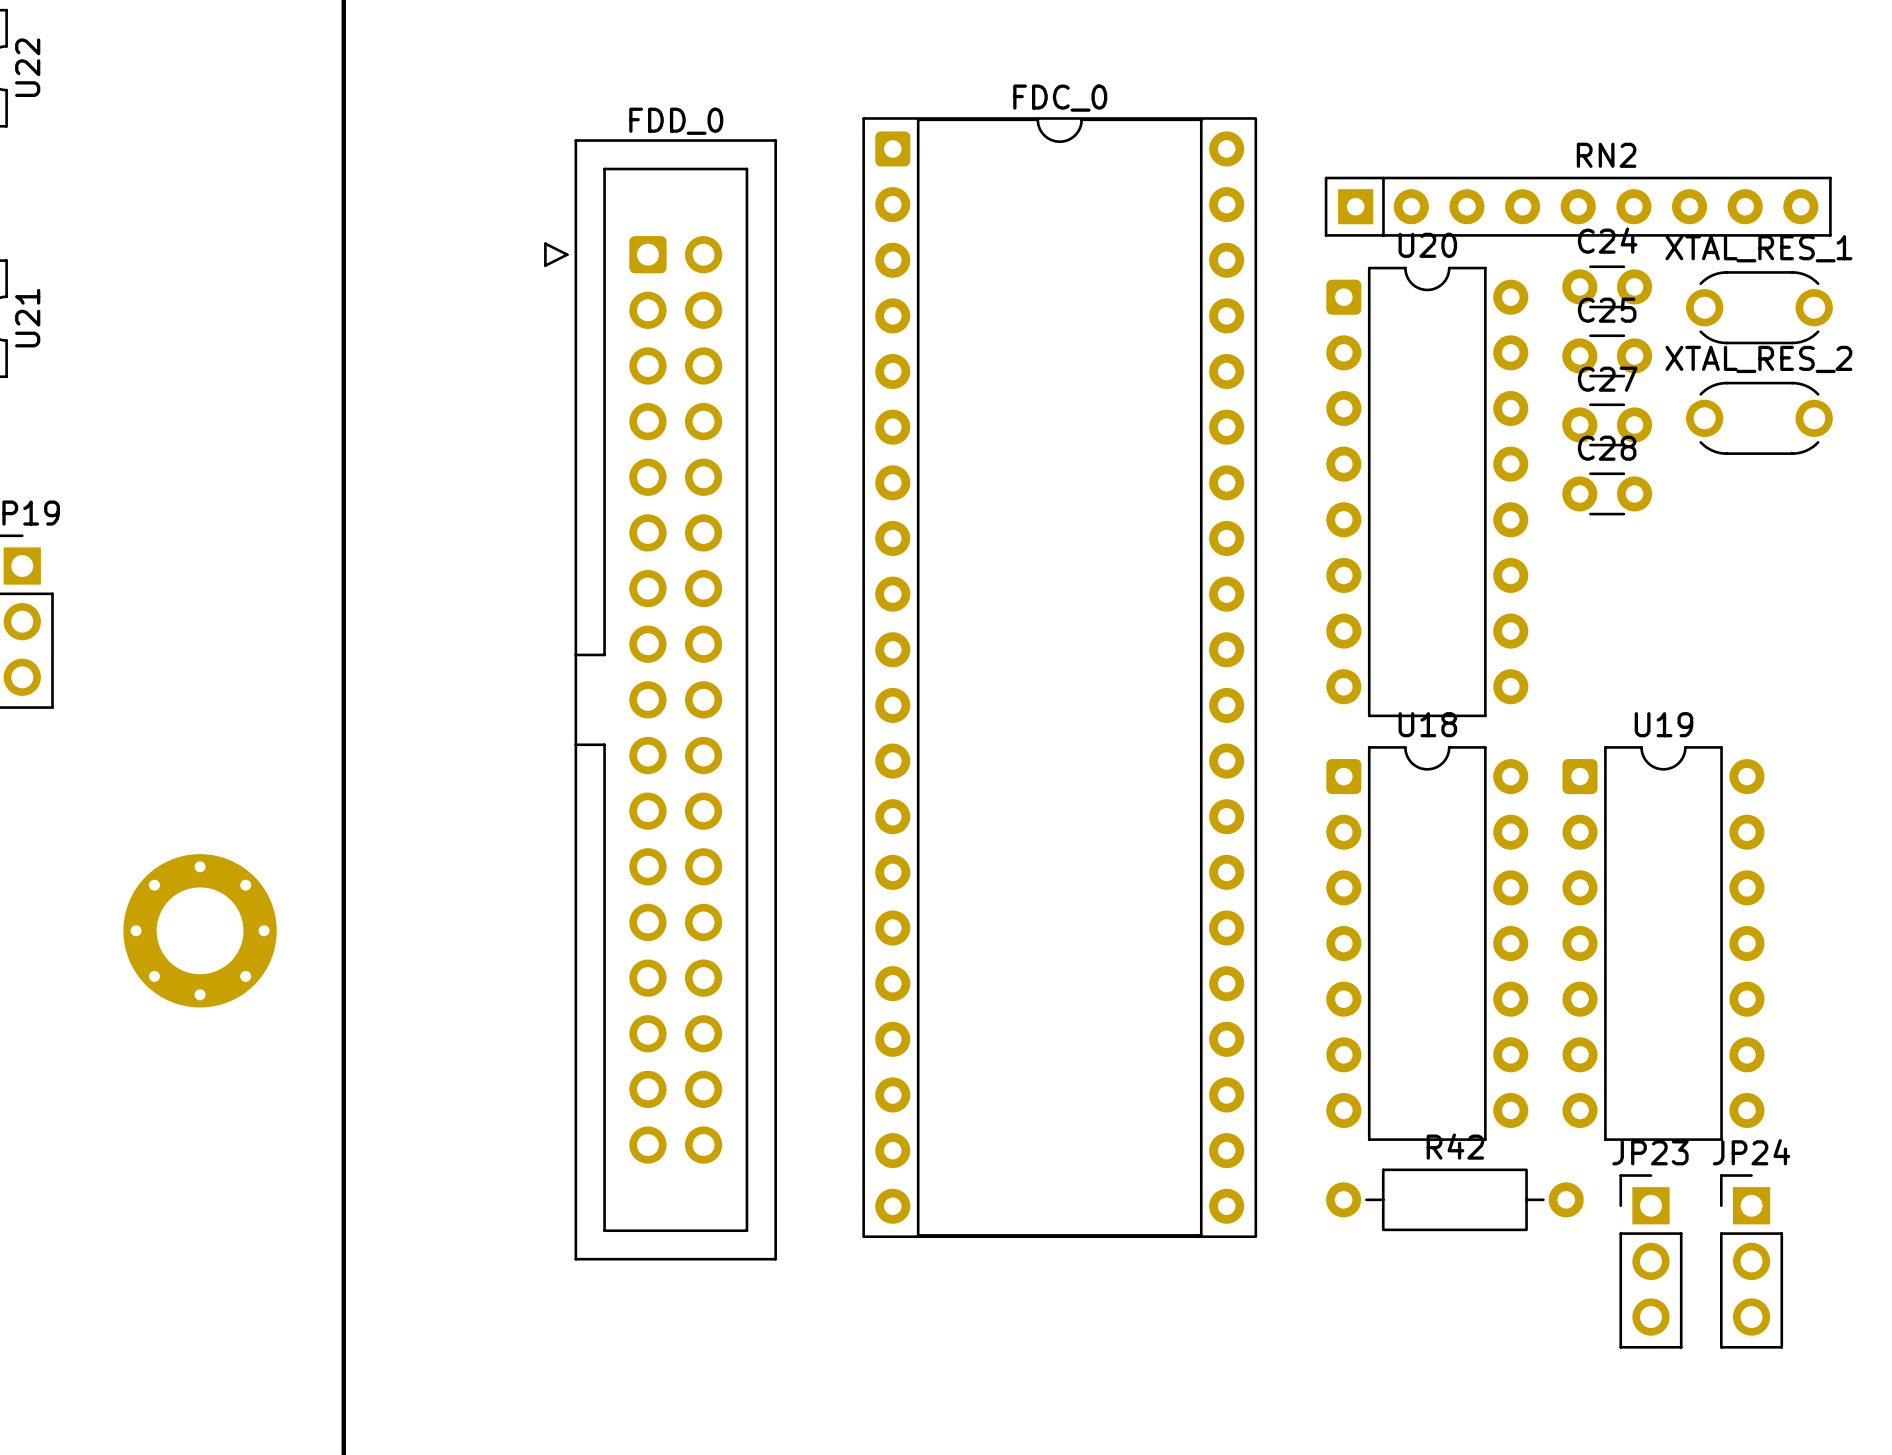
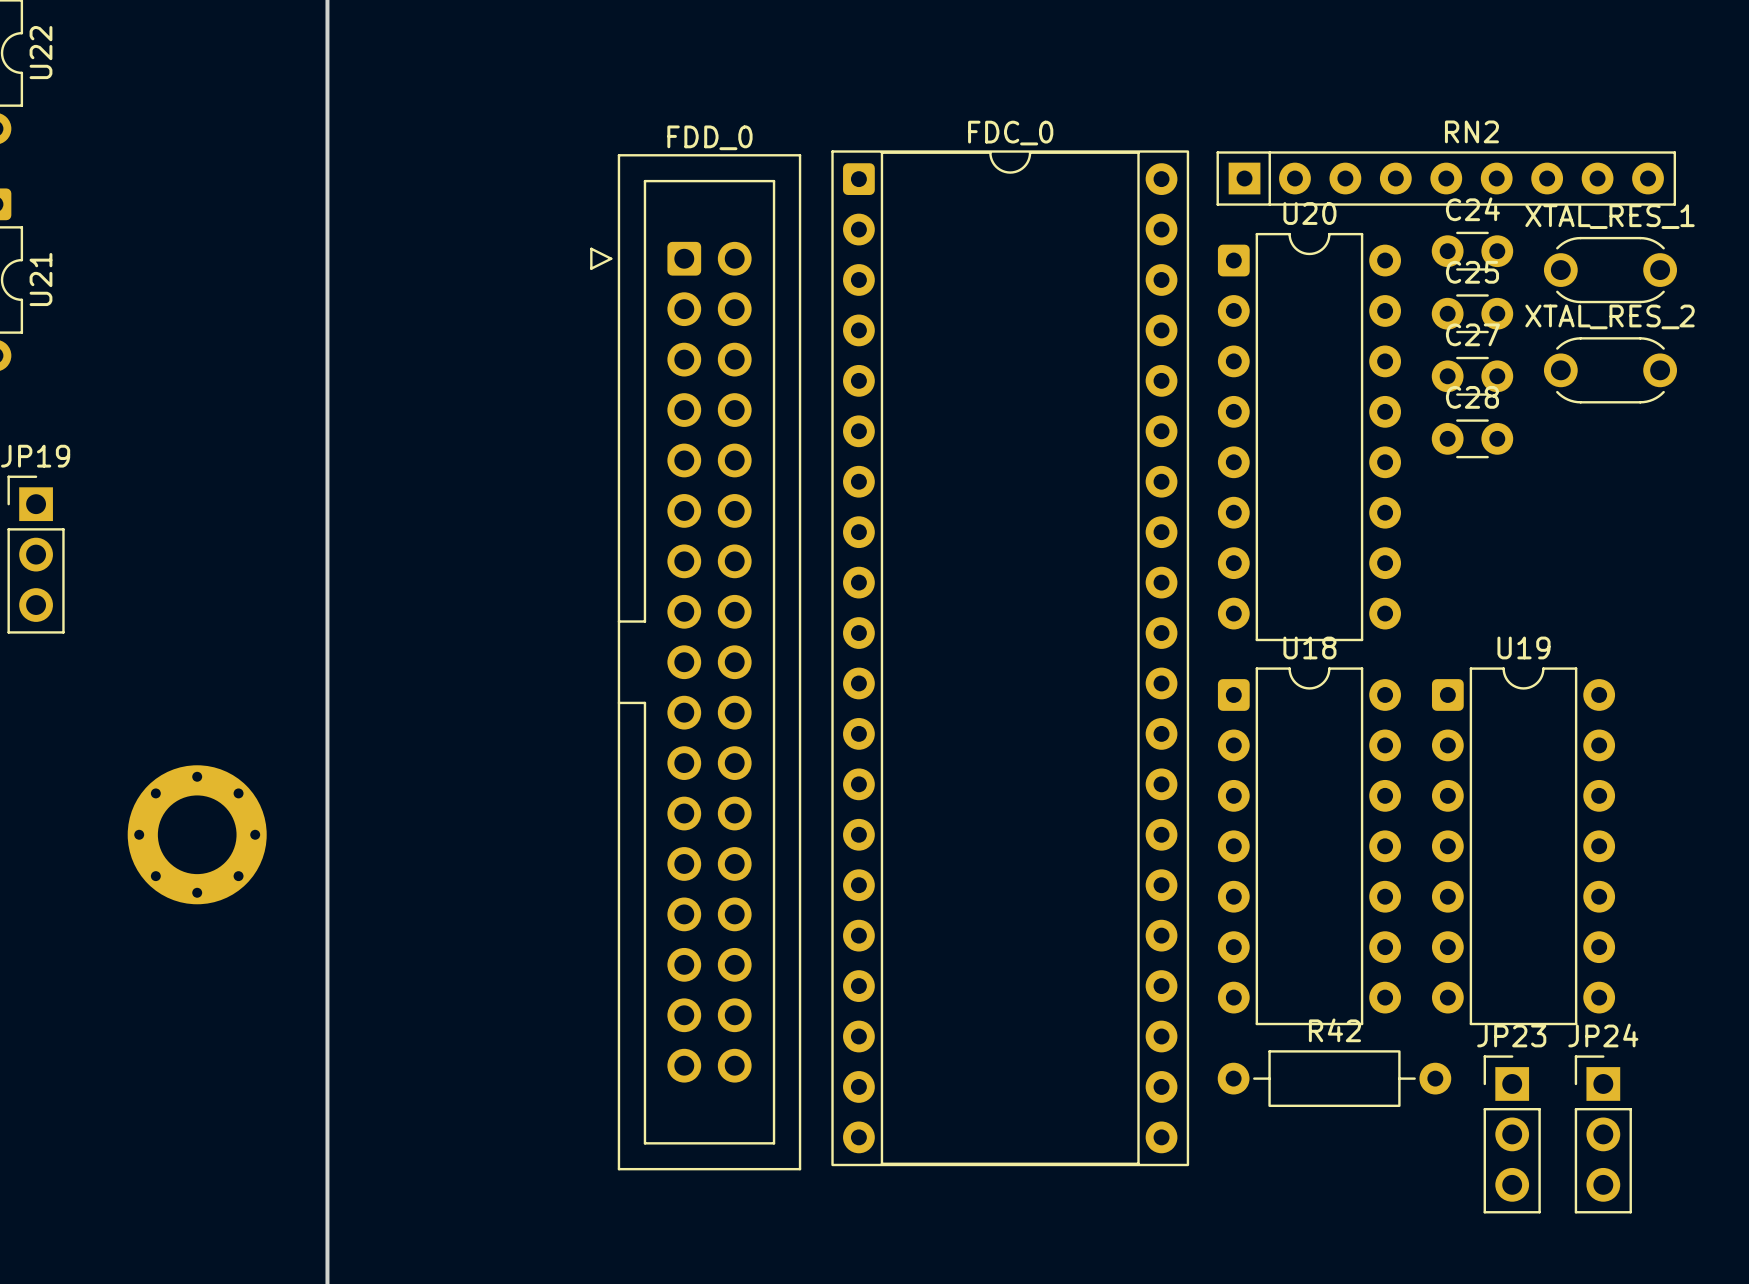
FDC_0 position: (1059, 677) -> (1010, 658)
FDD_0 position: (660, 699) -> (695, 662)

